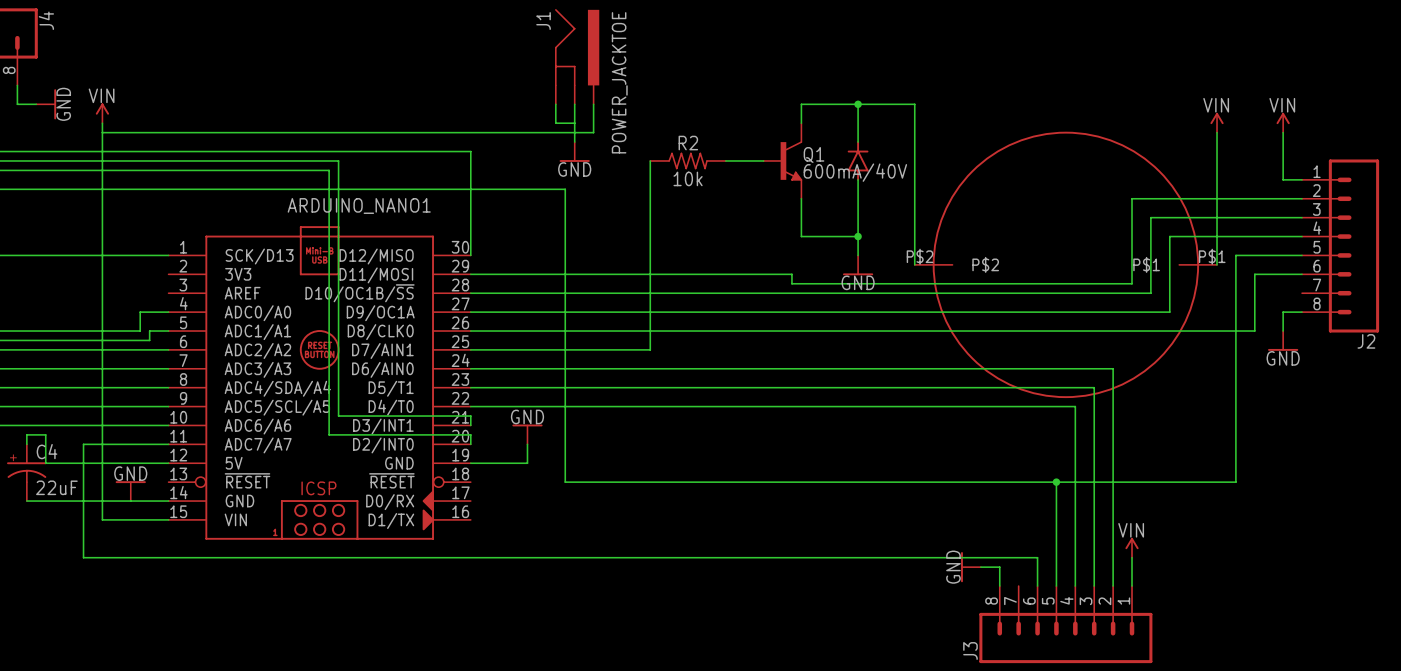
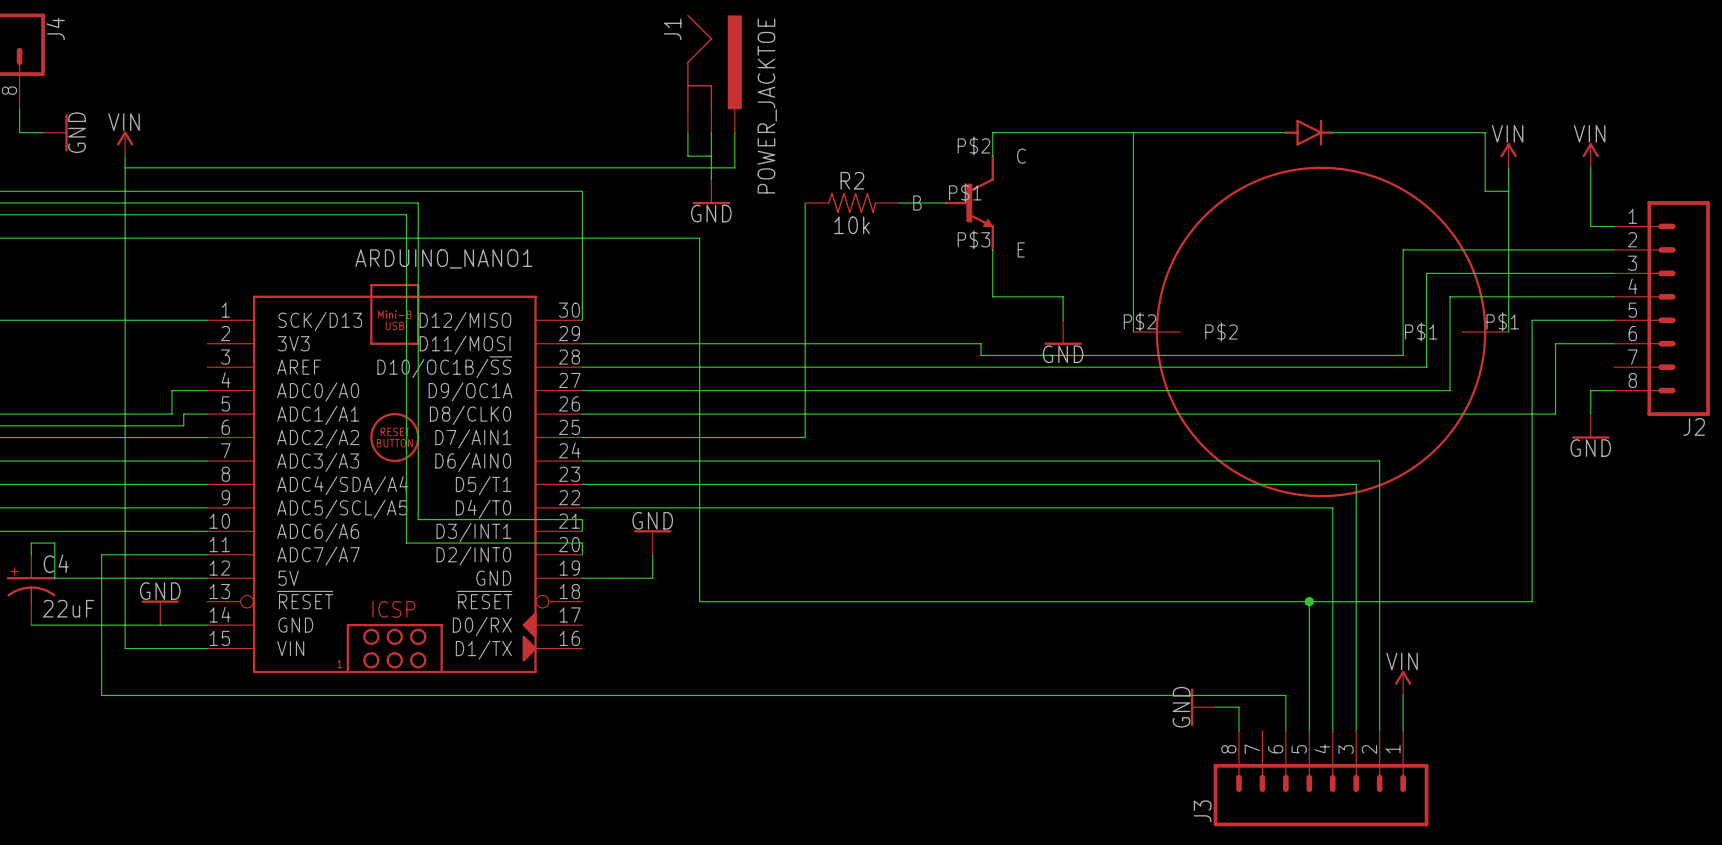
wire: (858, 104) (858, 142) -> none
junction: (858, 104) -> none
wire: none -> (1133, 132) (1285, 132)
part: none -> (1309, 132)
wire: none -> (1332, 132) (1485, 132) (1485, 191) (1508, 191)
Q1: 600mA/40V (782, 160) -> none
part: none -> (969, 203)
part: (858, 160) -> none
wire: (858, 179) (858, 236) -> none
junction: (858, 236) -> none

